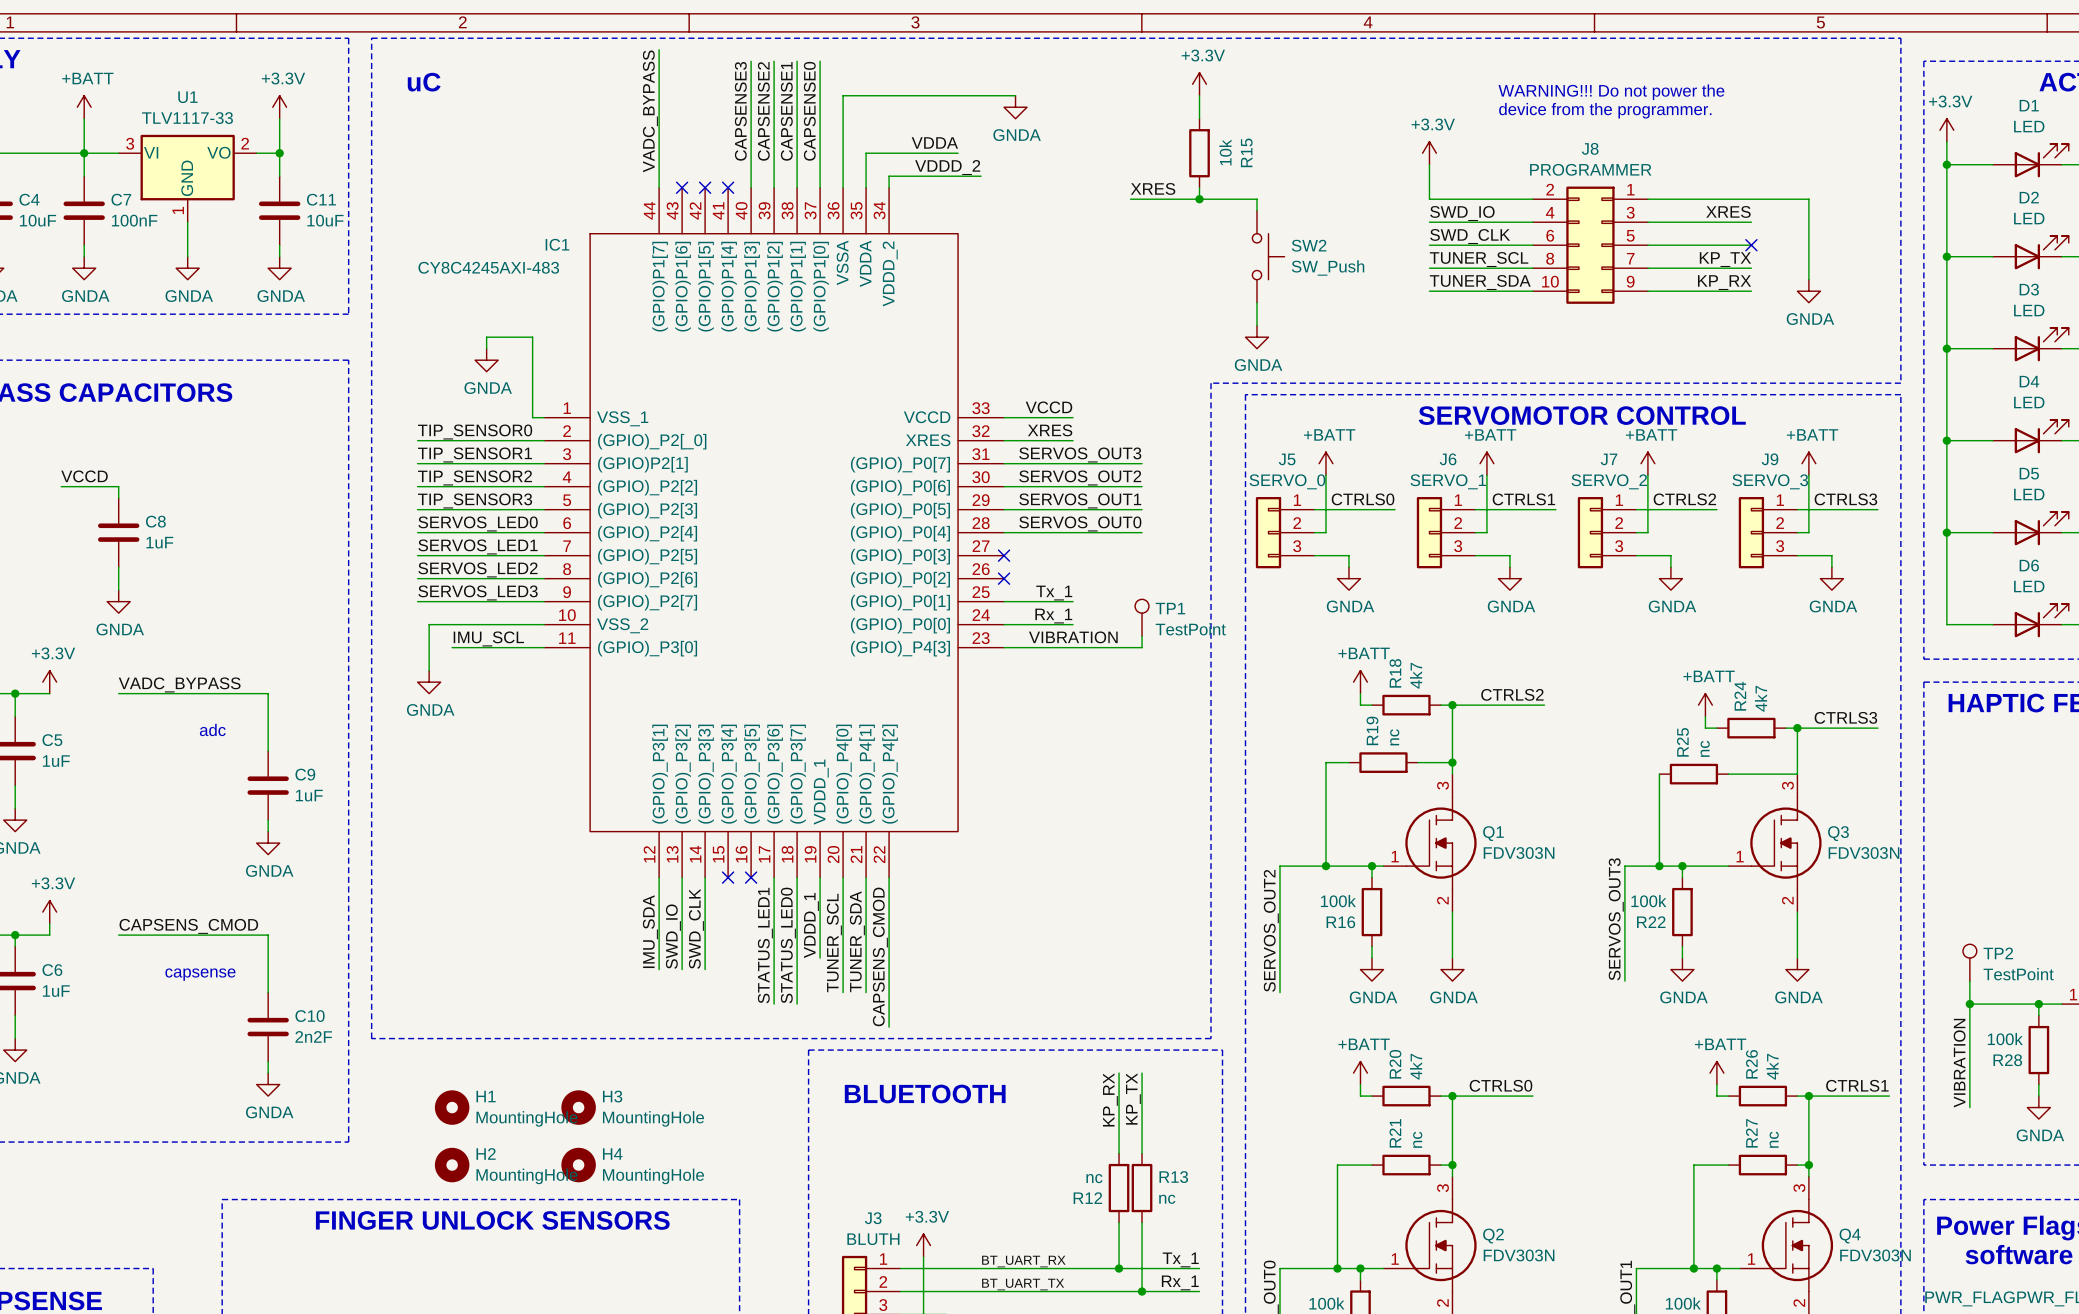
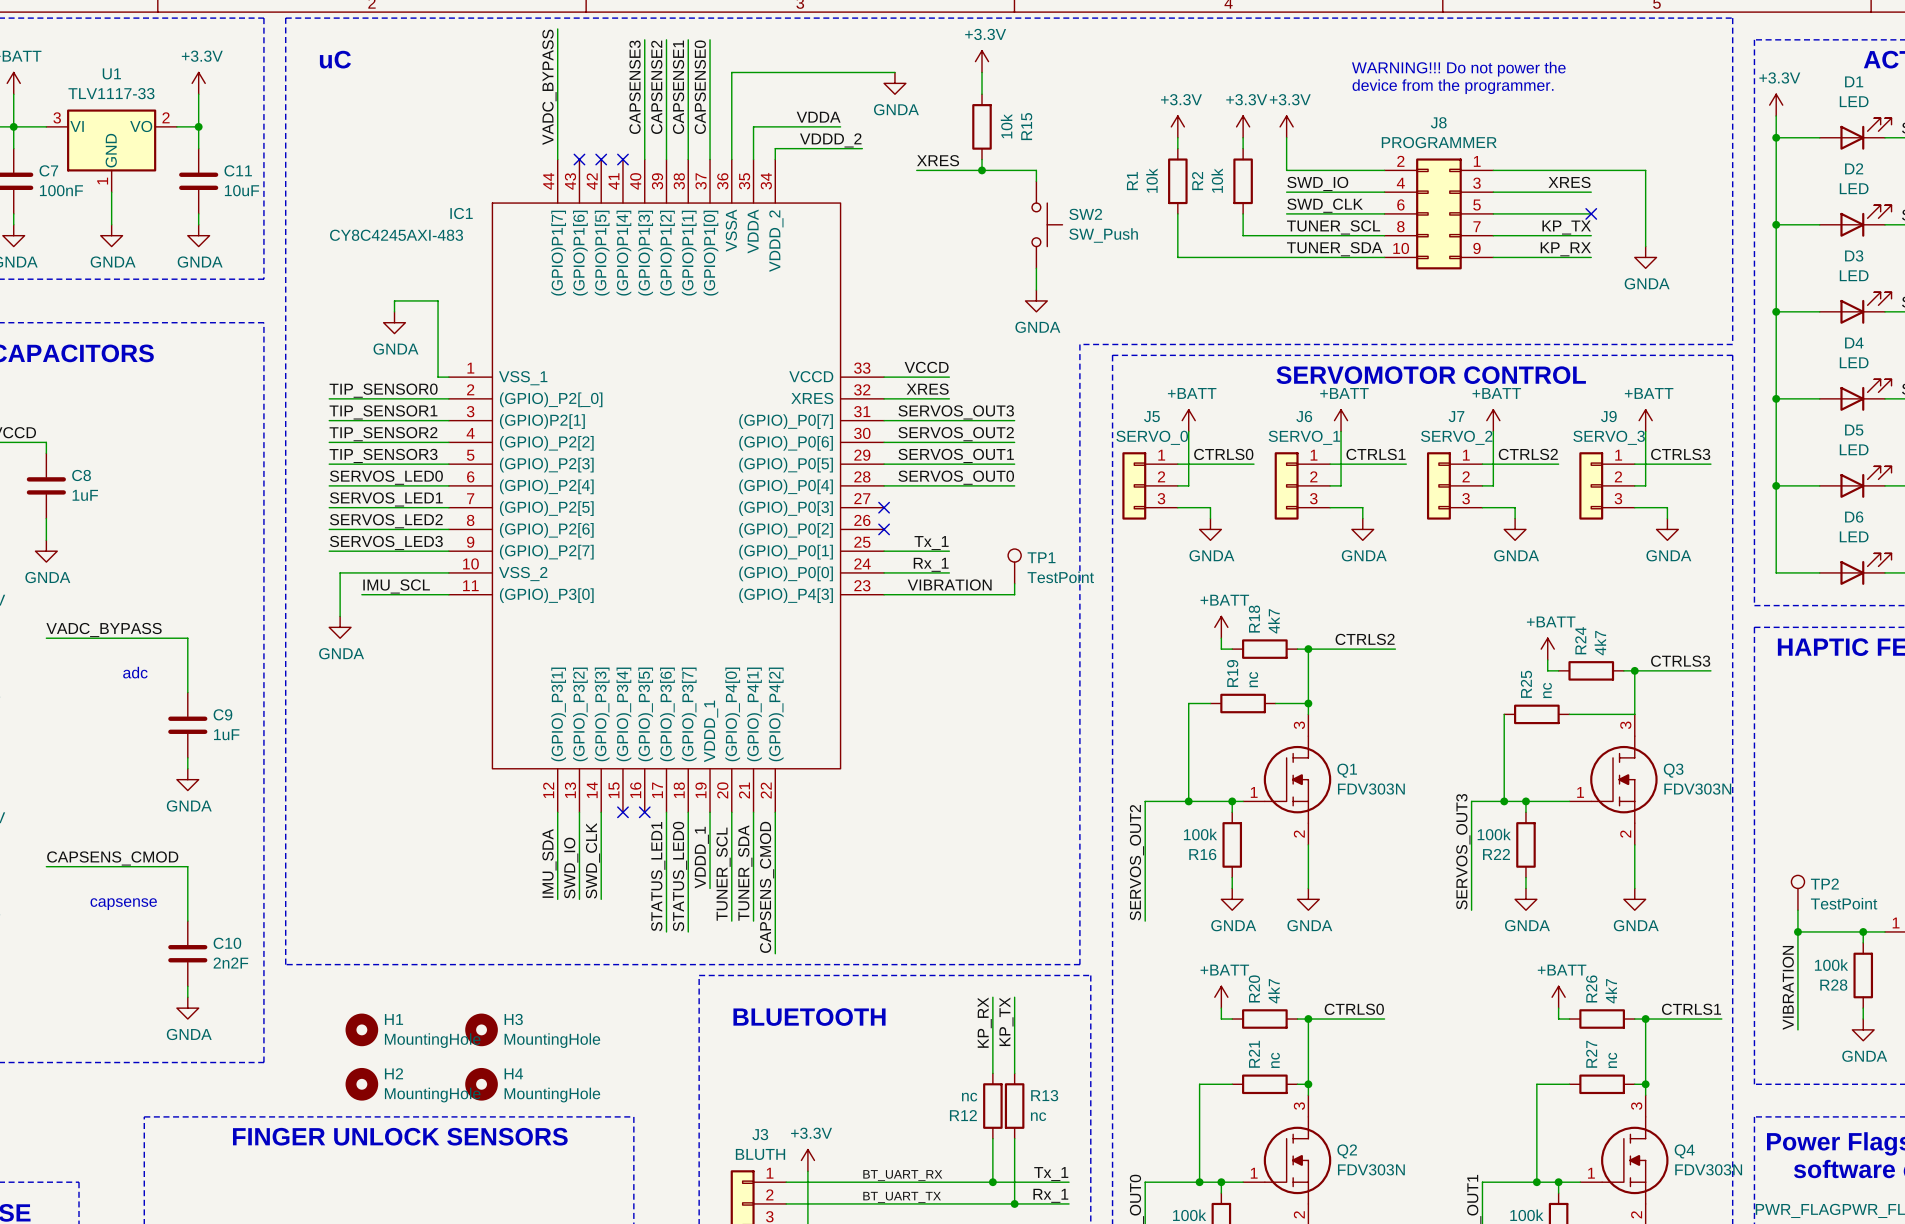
power symbol: none -> +3.3V (982, 61)
power symbol: +3.3V (1199, 84) -> none
wire: (1199, 95) (1199, 118) -> (982, 72) (982, 94)
R15 position: (1199, 153) -> (982, 126)
power symbol: none -> +3.3V (1177, 126)
power symbol: none -> +3.3V (1243, 126)
wire: none -> (1177, 137) (1177, 148)
wire: none -> (1243, 137) (1243, 148)
wire: (1199, 187) (1199, 199) -> (982, 159) (982, 170)
label position: XRES (1153, 188) -> XRES (938, 160)
wire: none -> (916, 170) (1003, 170)
junction: none -> (982, 170)
wire: (1165, 199) (1257, 199) (1257, 210) -> (1036, 170) (1036, 181)
junction: (1199, 199) -> none
R1: none -> 10k (1177, 181)
R2: none -> 10k (1243, 181)
wire: none -> (1177, 213) (1177, 257) (1286, 257)
wire: none -> (1243, 213) (1243, 235) (1286, 235)
SW2 position: (1268, 256) -> (1047, 224)
wire: (1257, 302) (1257, 325) -> (1036, 268) (1036, 290)
power symbol position: GNDA (1257, 337) -> GNDA (1036, 300)

